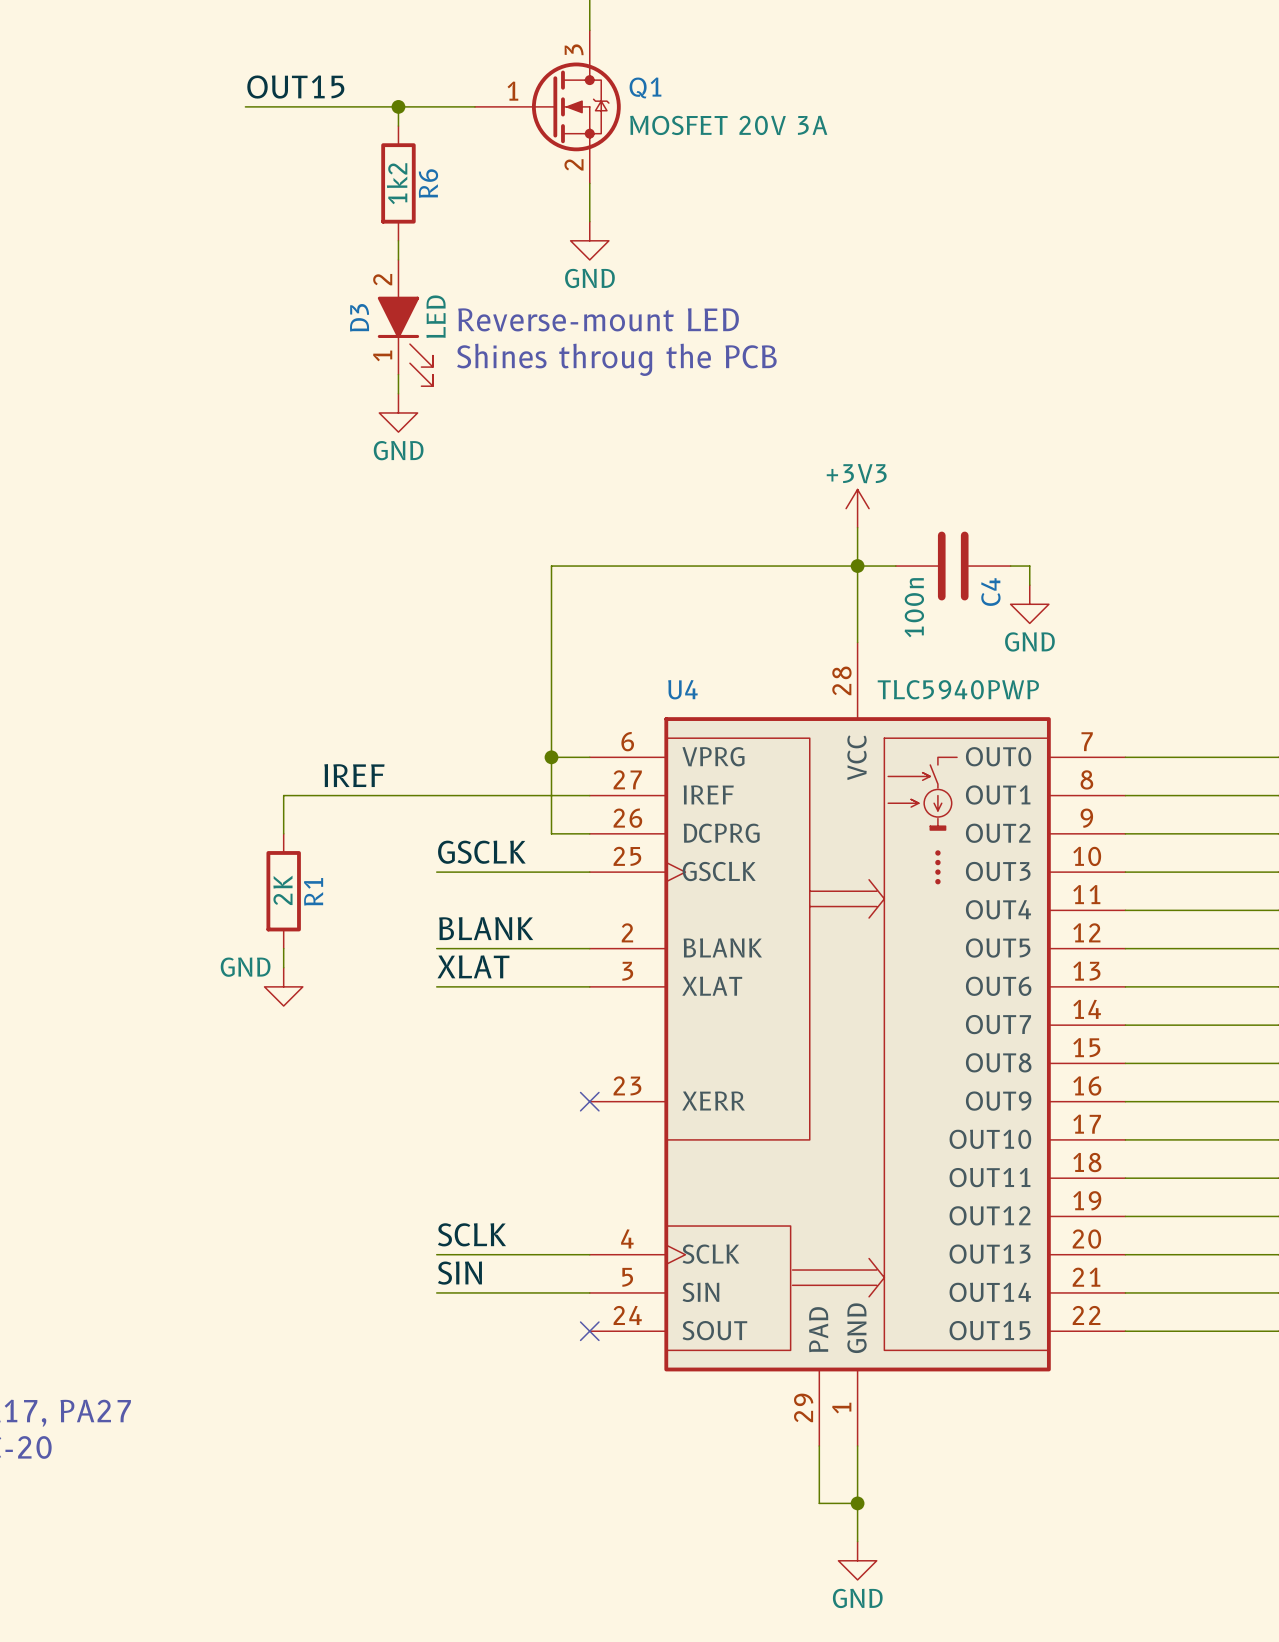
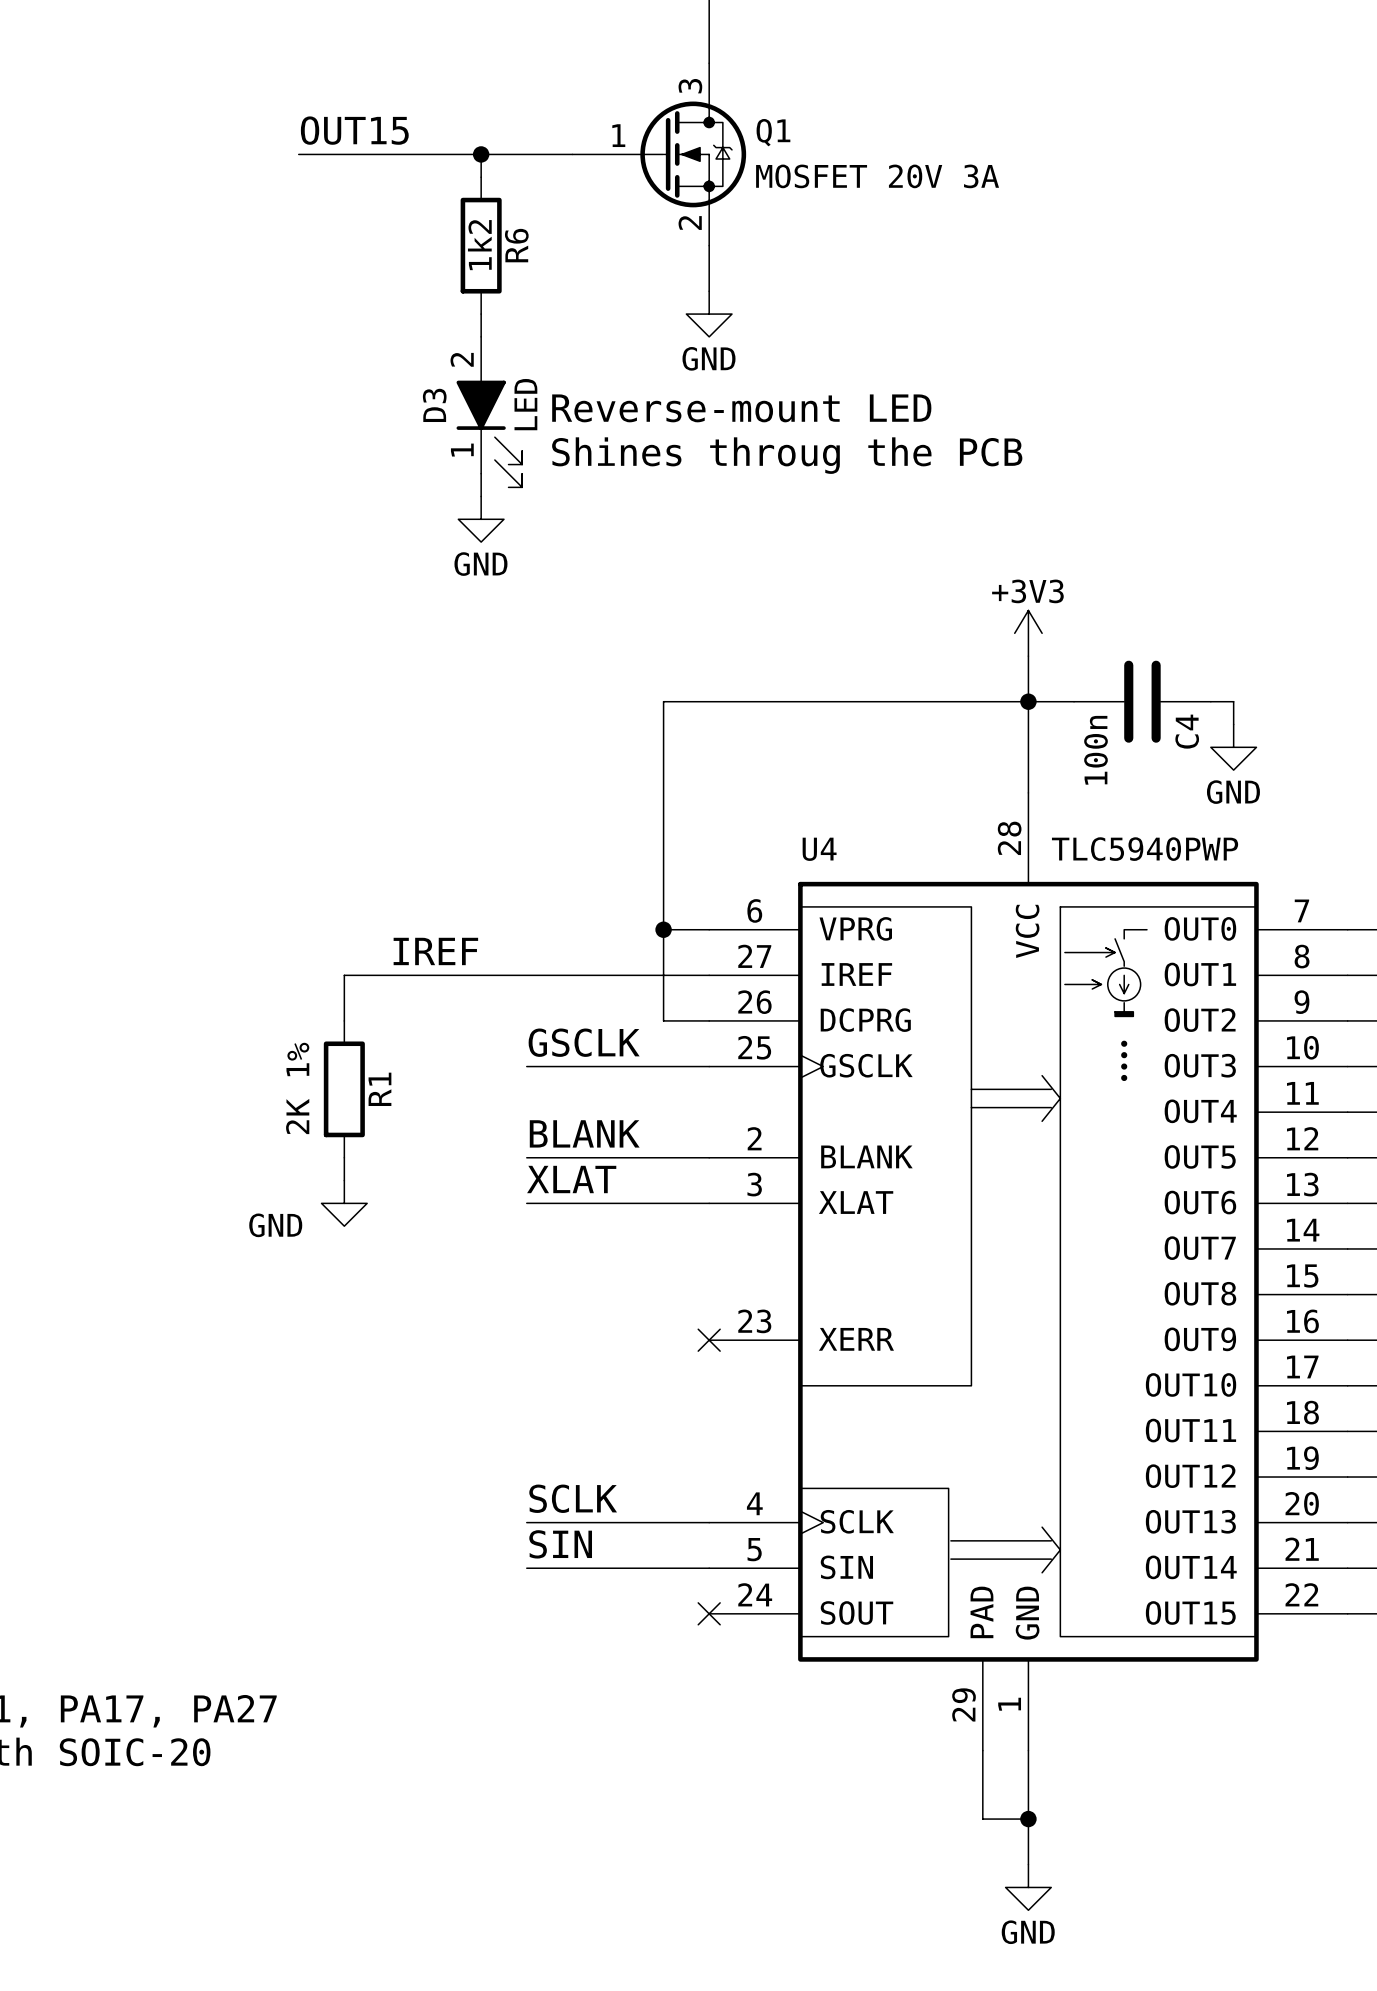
R1 value: 2K (282, 890) -> 2K 1% (297, 1088)
power symbol text position: GND (245, 967) -> GND (275, 1225)

